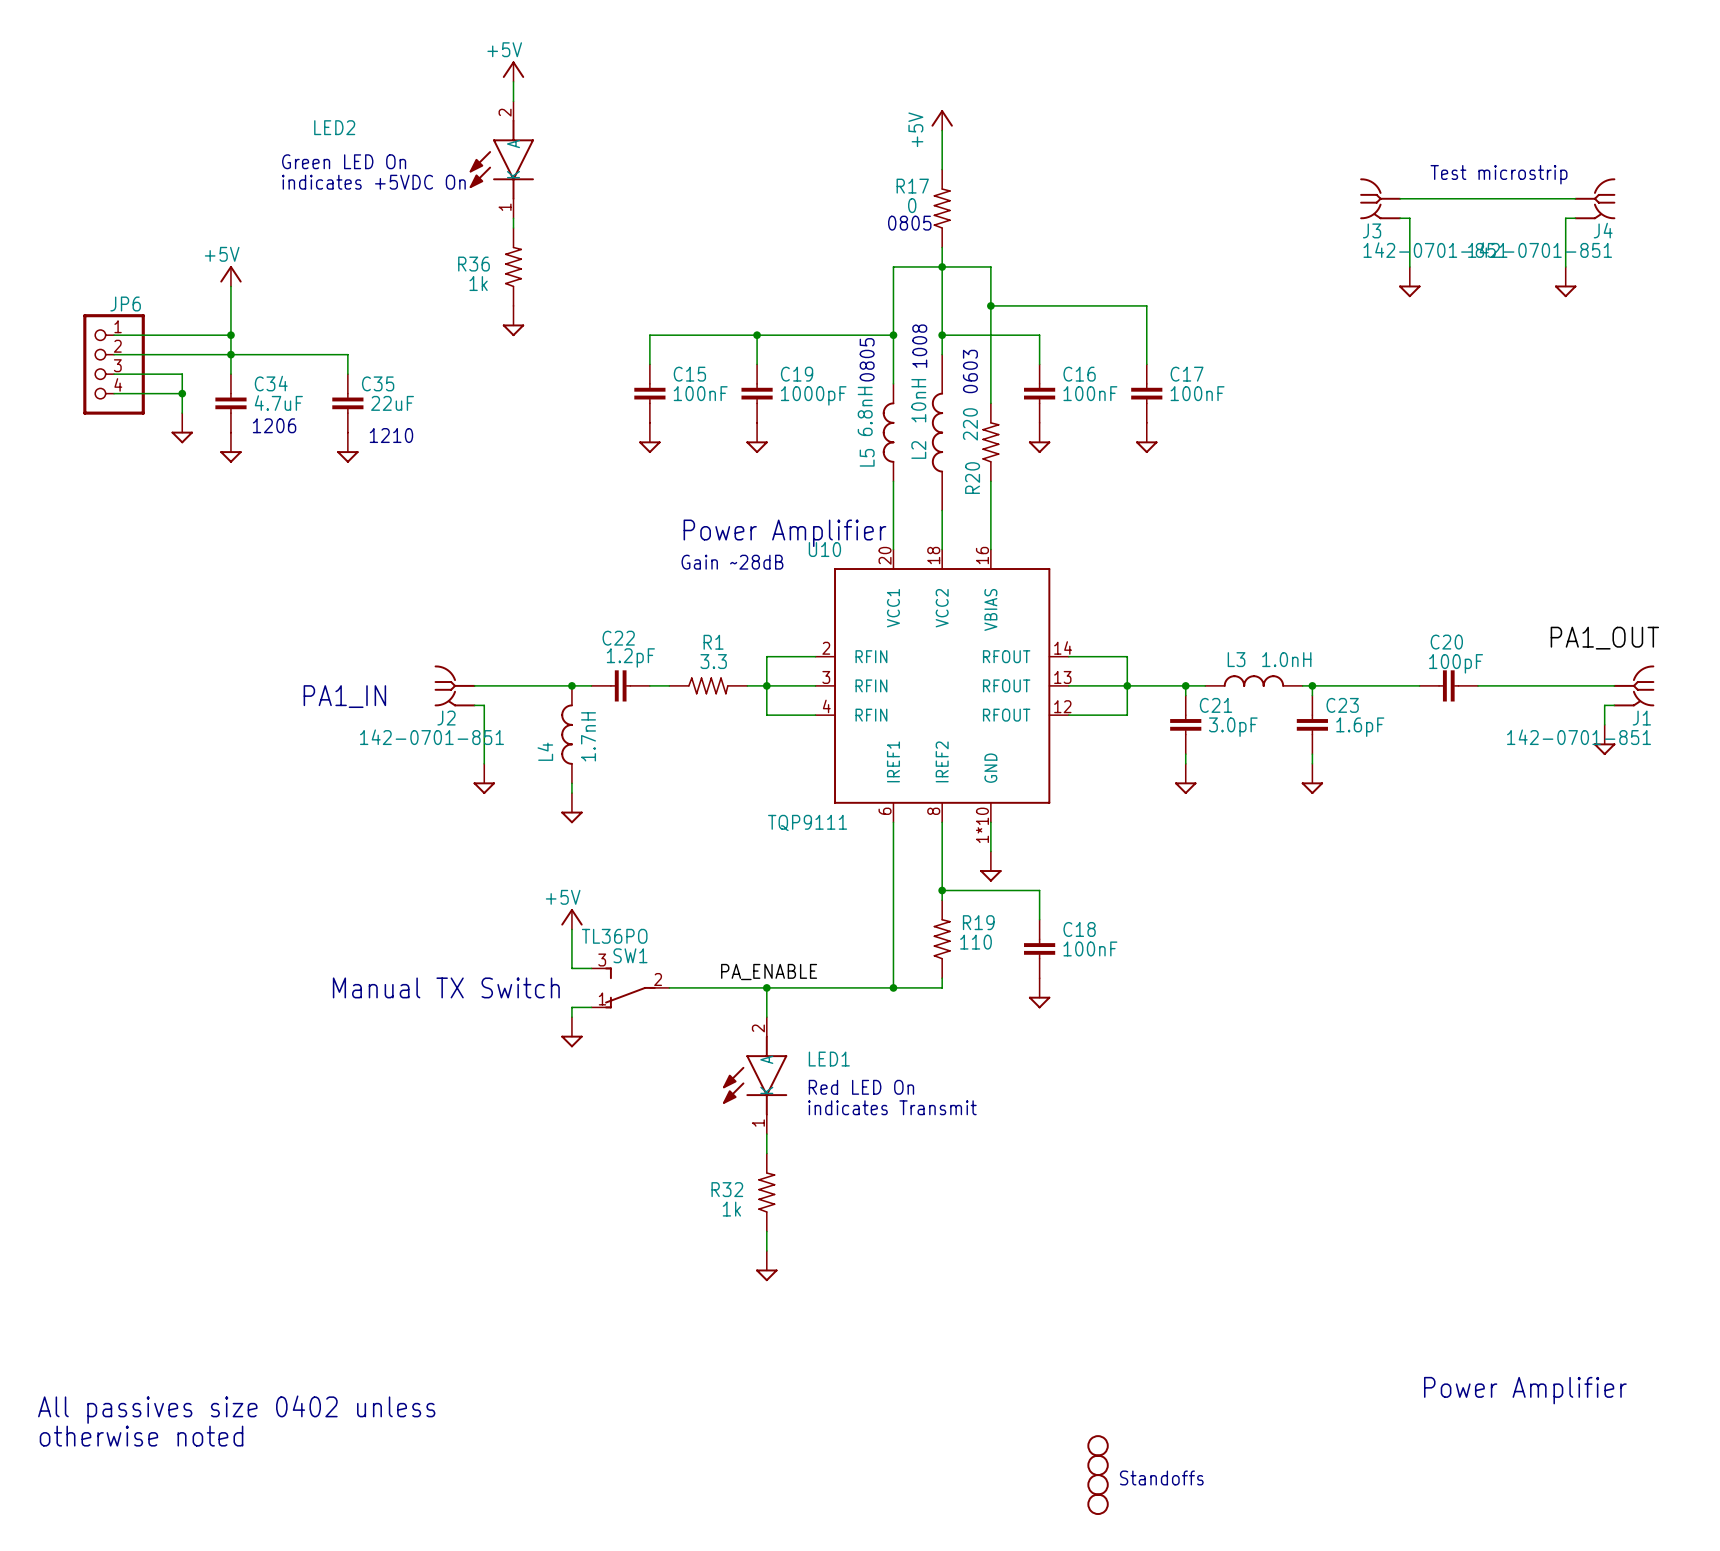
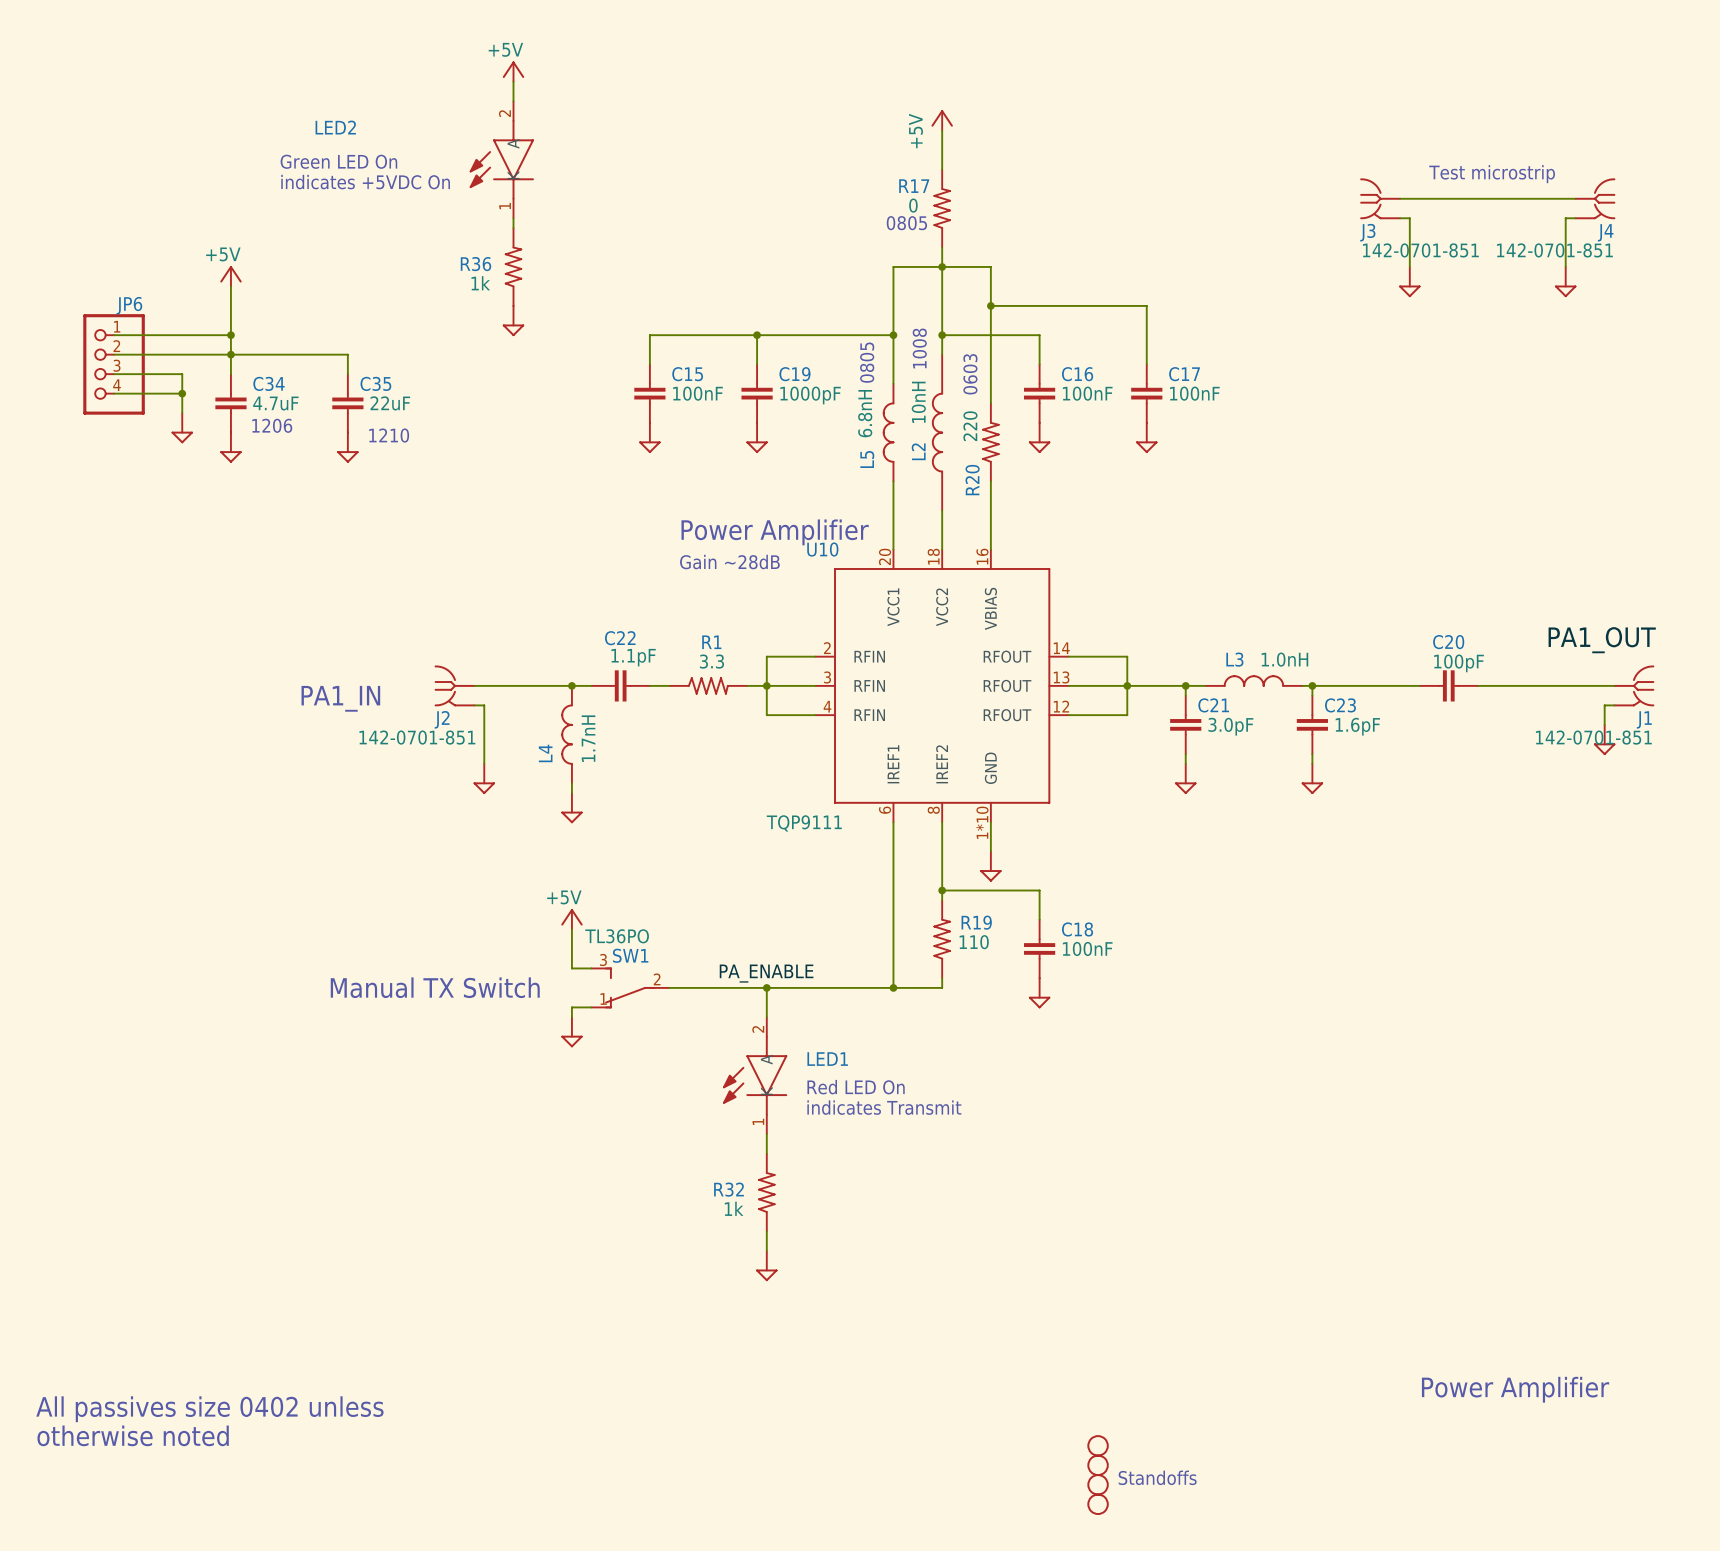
C22 value: 1.2pF (630, 657) -> 1.1pF (633, 657)

